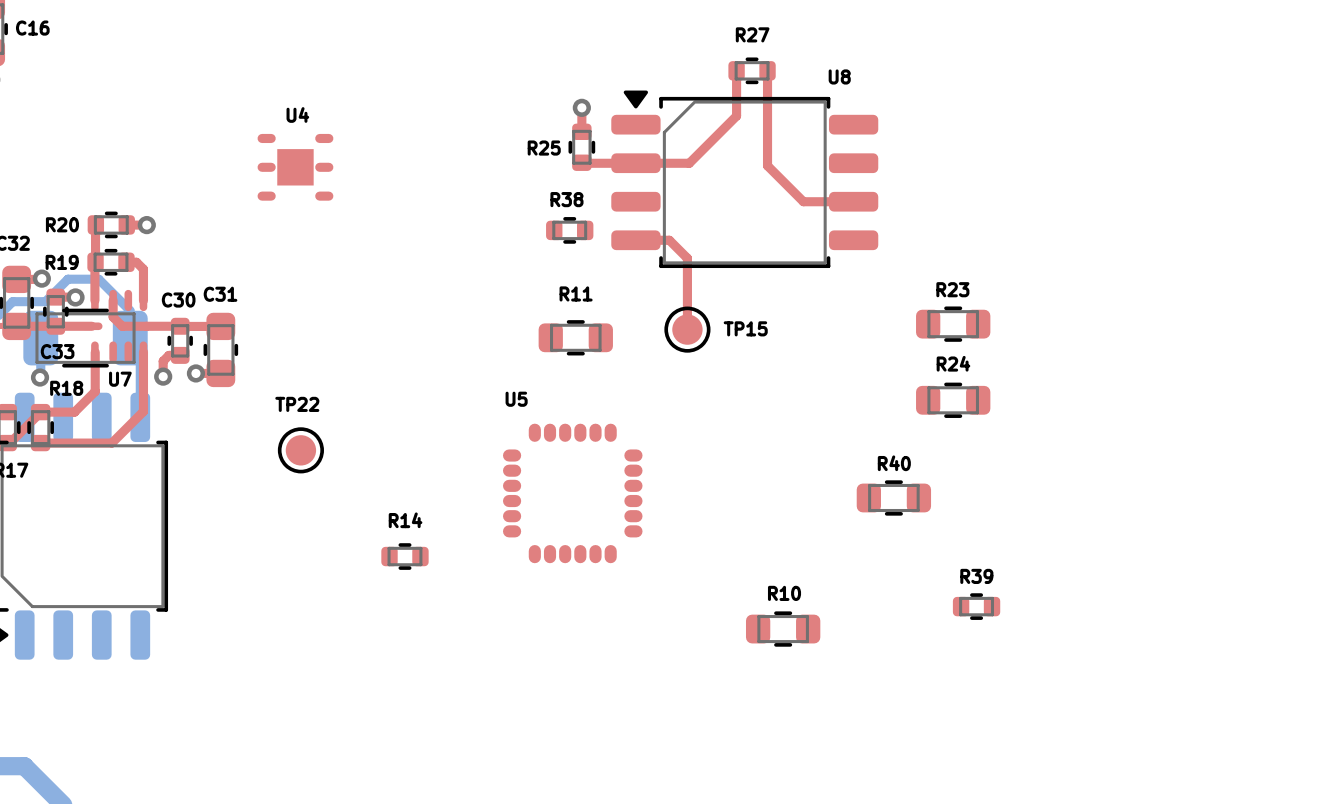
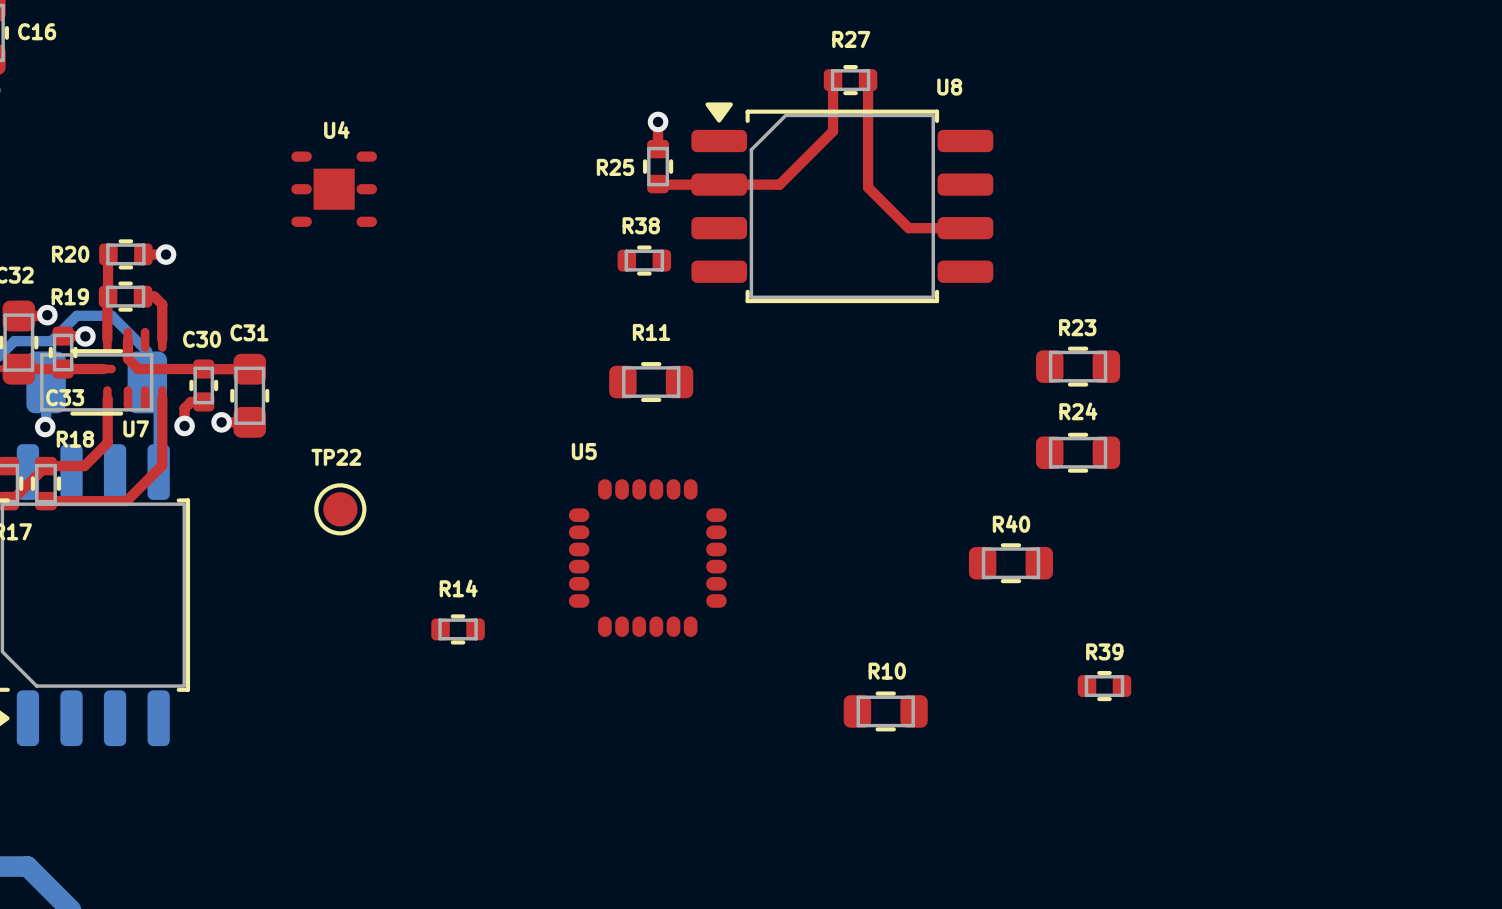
top track: (635, 240) (669, 240) (687, 258) (687, 329) -> none
TP15: (687, 329) -> none

